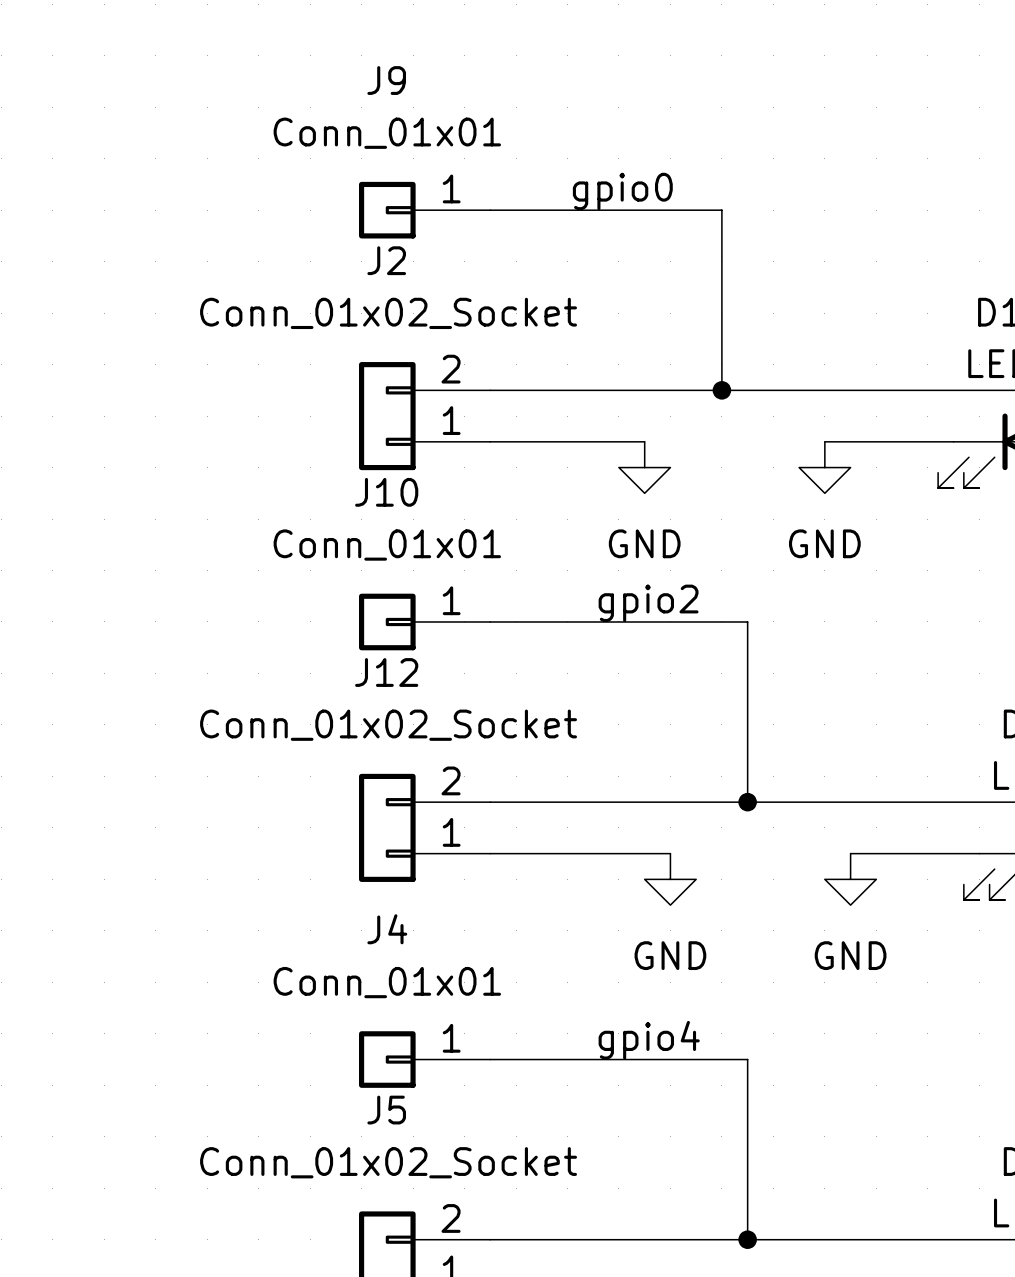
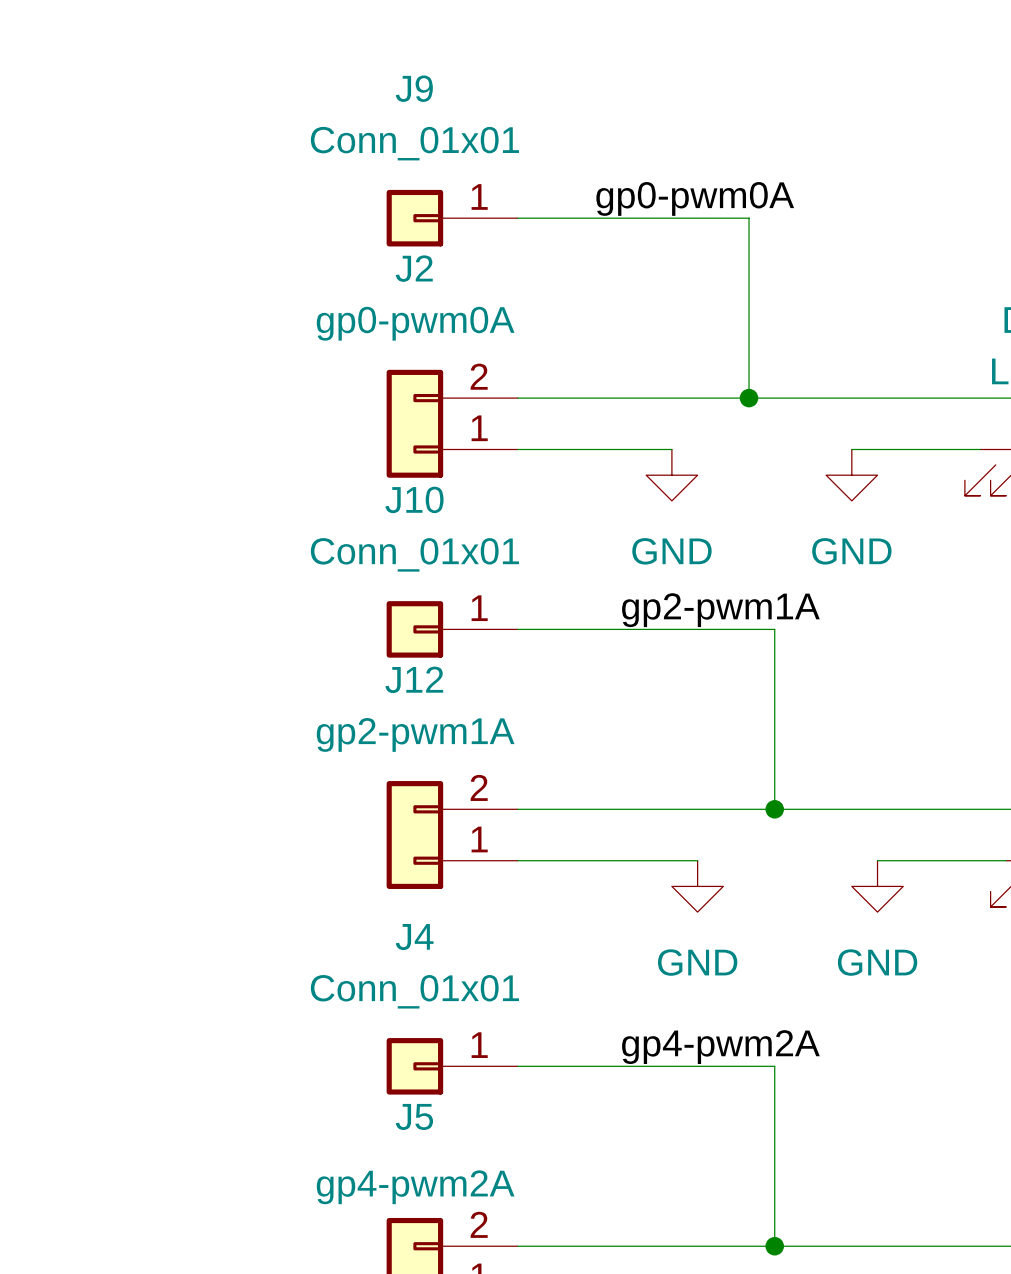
label: gpio0 (622, 191) -> gp0-pwm0A (695, 198)
J2 value: Conn_01x02_Socket (388, 313) -> gp0-pwm0A (415, 323)
label: gpio2 (648, 603) -> gp2-pwm1A (720, 610)
J12 value: Conn_01x02_Socket (388, 725) -> gp2-pwm1A (415, 734)
label: gpio4 (649, 1040) -> gp4-pwm2A (720, 1047)
J5 value: Conn_01x02_Socket (388, 1162) -> gp4-pwm2A (415, 1187)

